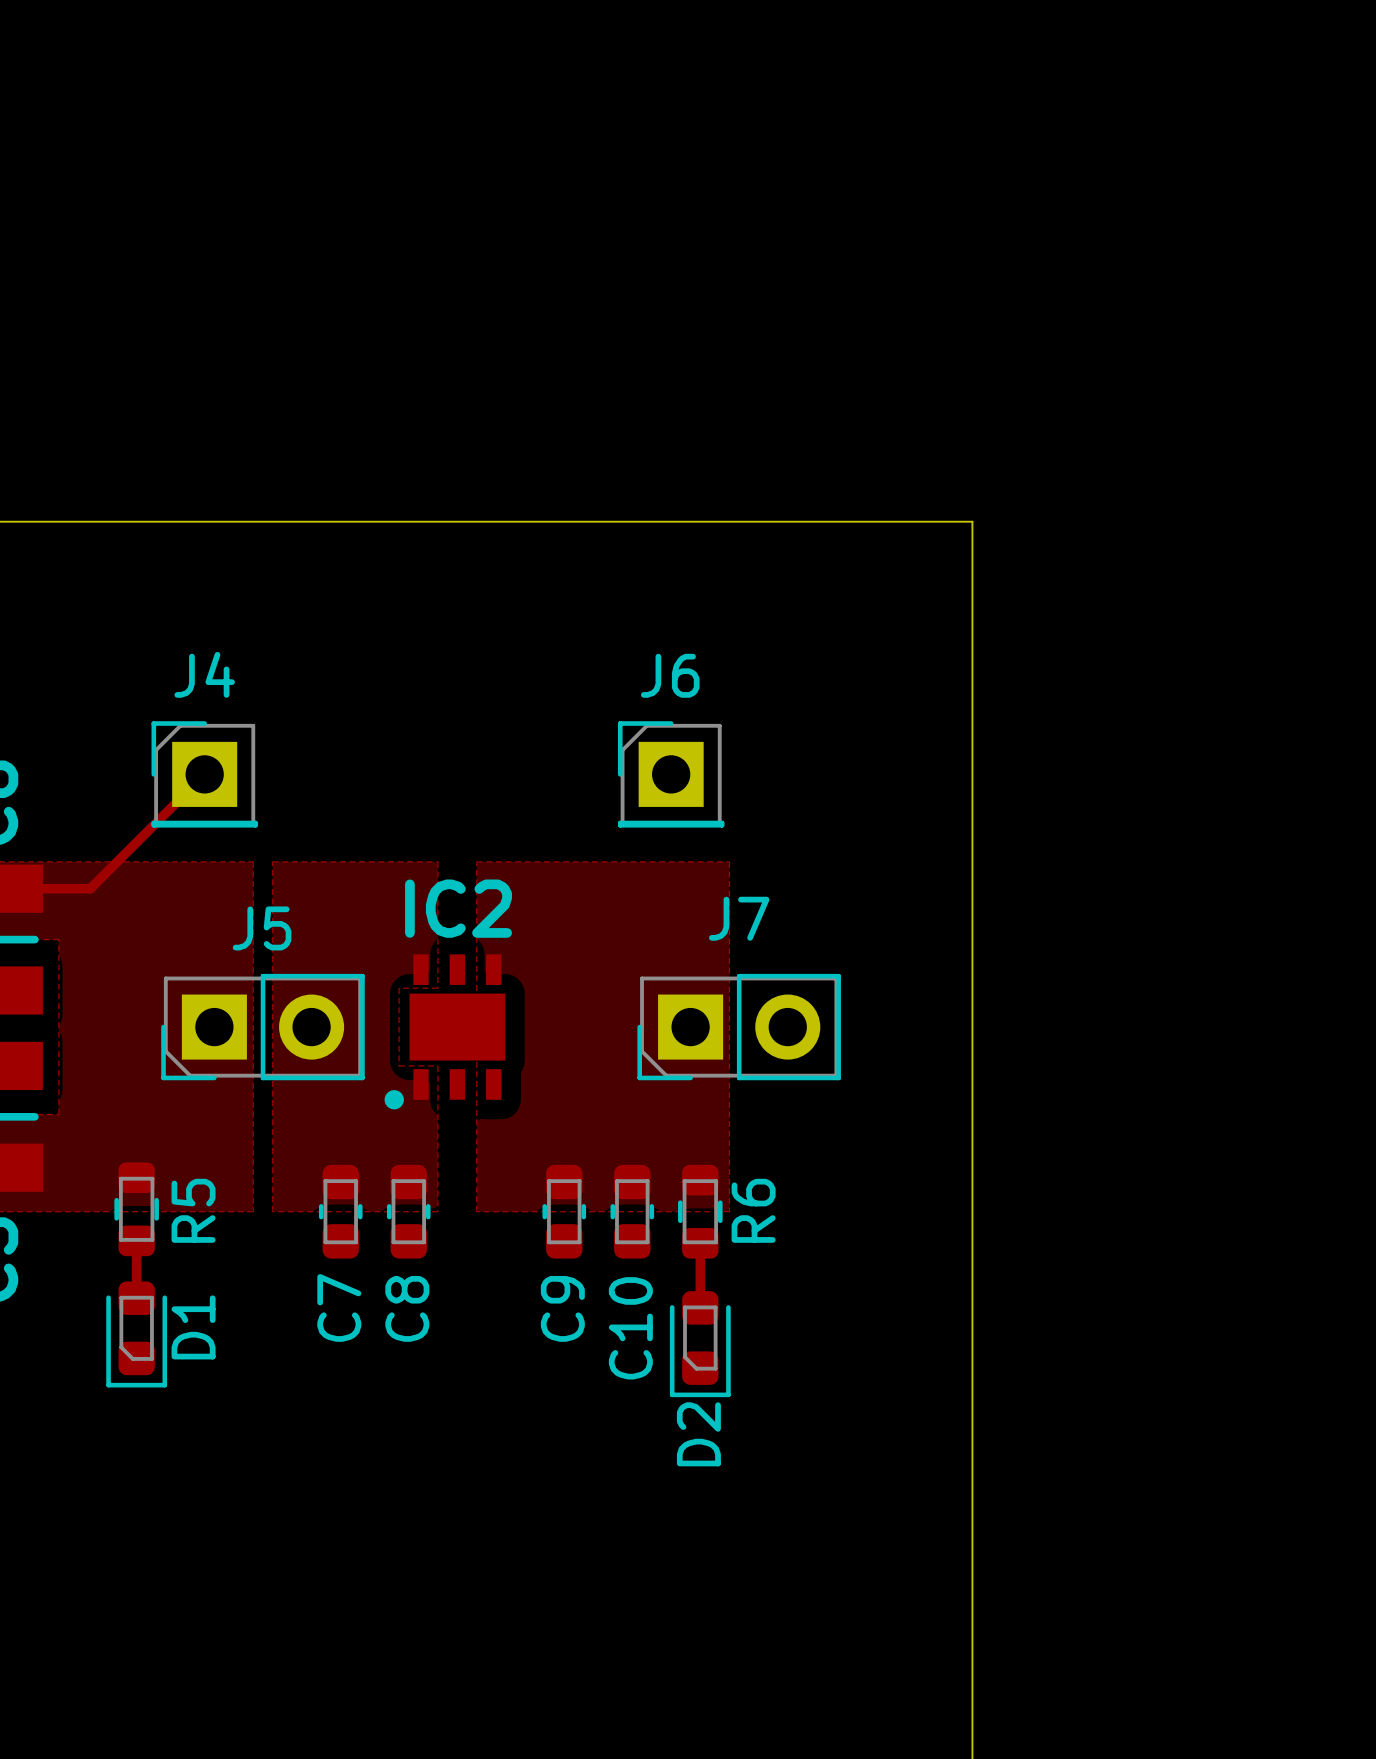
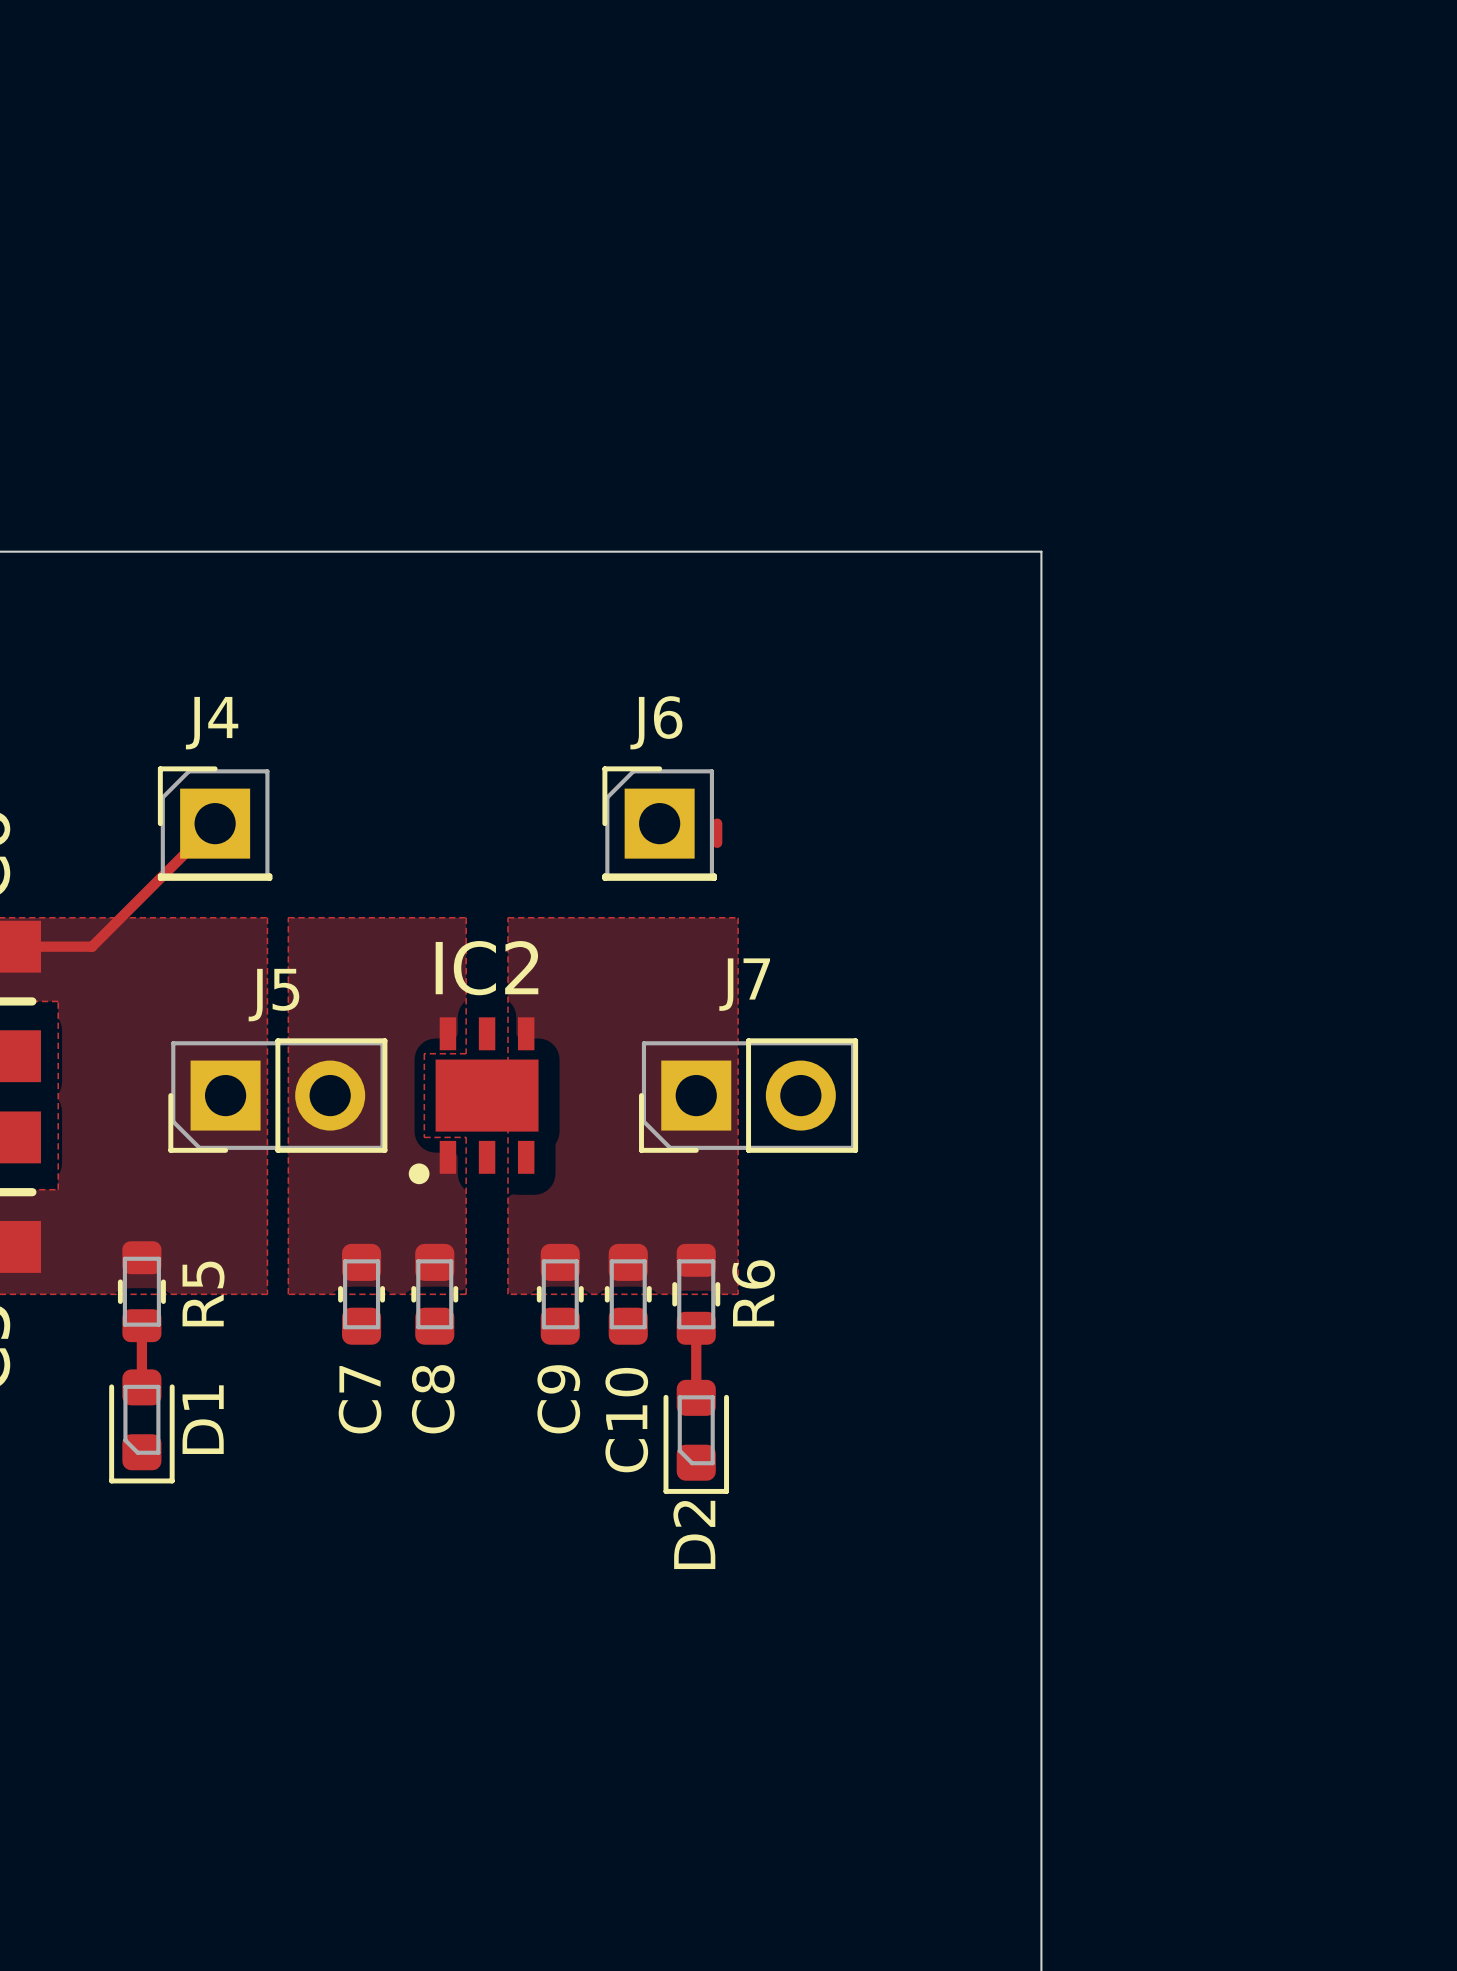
J6 position: (671, 774) -> (659, 823)
zone outline: (690, 861) (729, 861) (729, 1211) (690, 1211) -> (738, 917) (738, 1294)
J7 position: (739, 1027) -> (748, 1095)
C9 position: (564, 1211) -> (560, 1294)
C10 position: (632, 1211) -> (628, 1294)
R6 position: (700, 1211) -> (696, 1294)
track: (700, 1243) (700, 1307) -> (696, 1328) (696, 1397)
D2 position: (700, 1344) -> (696, 1436)

